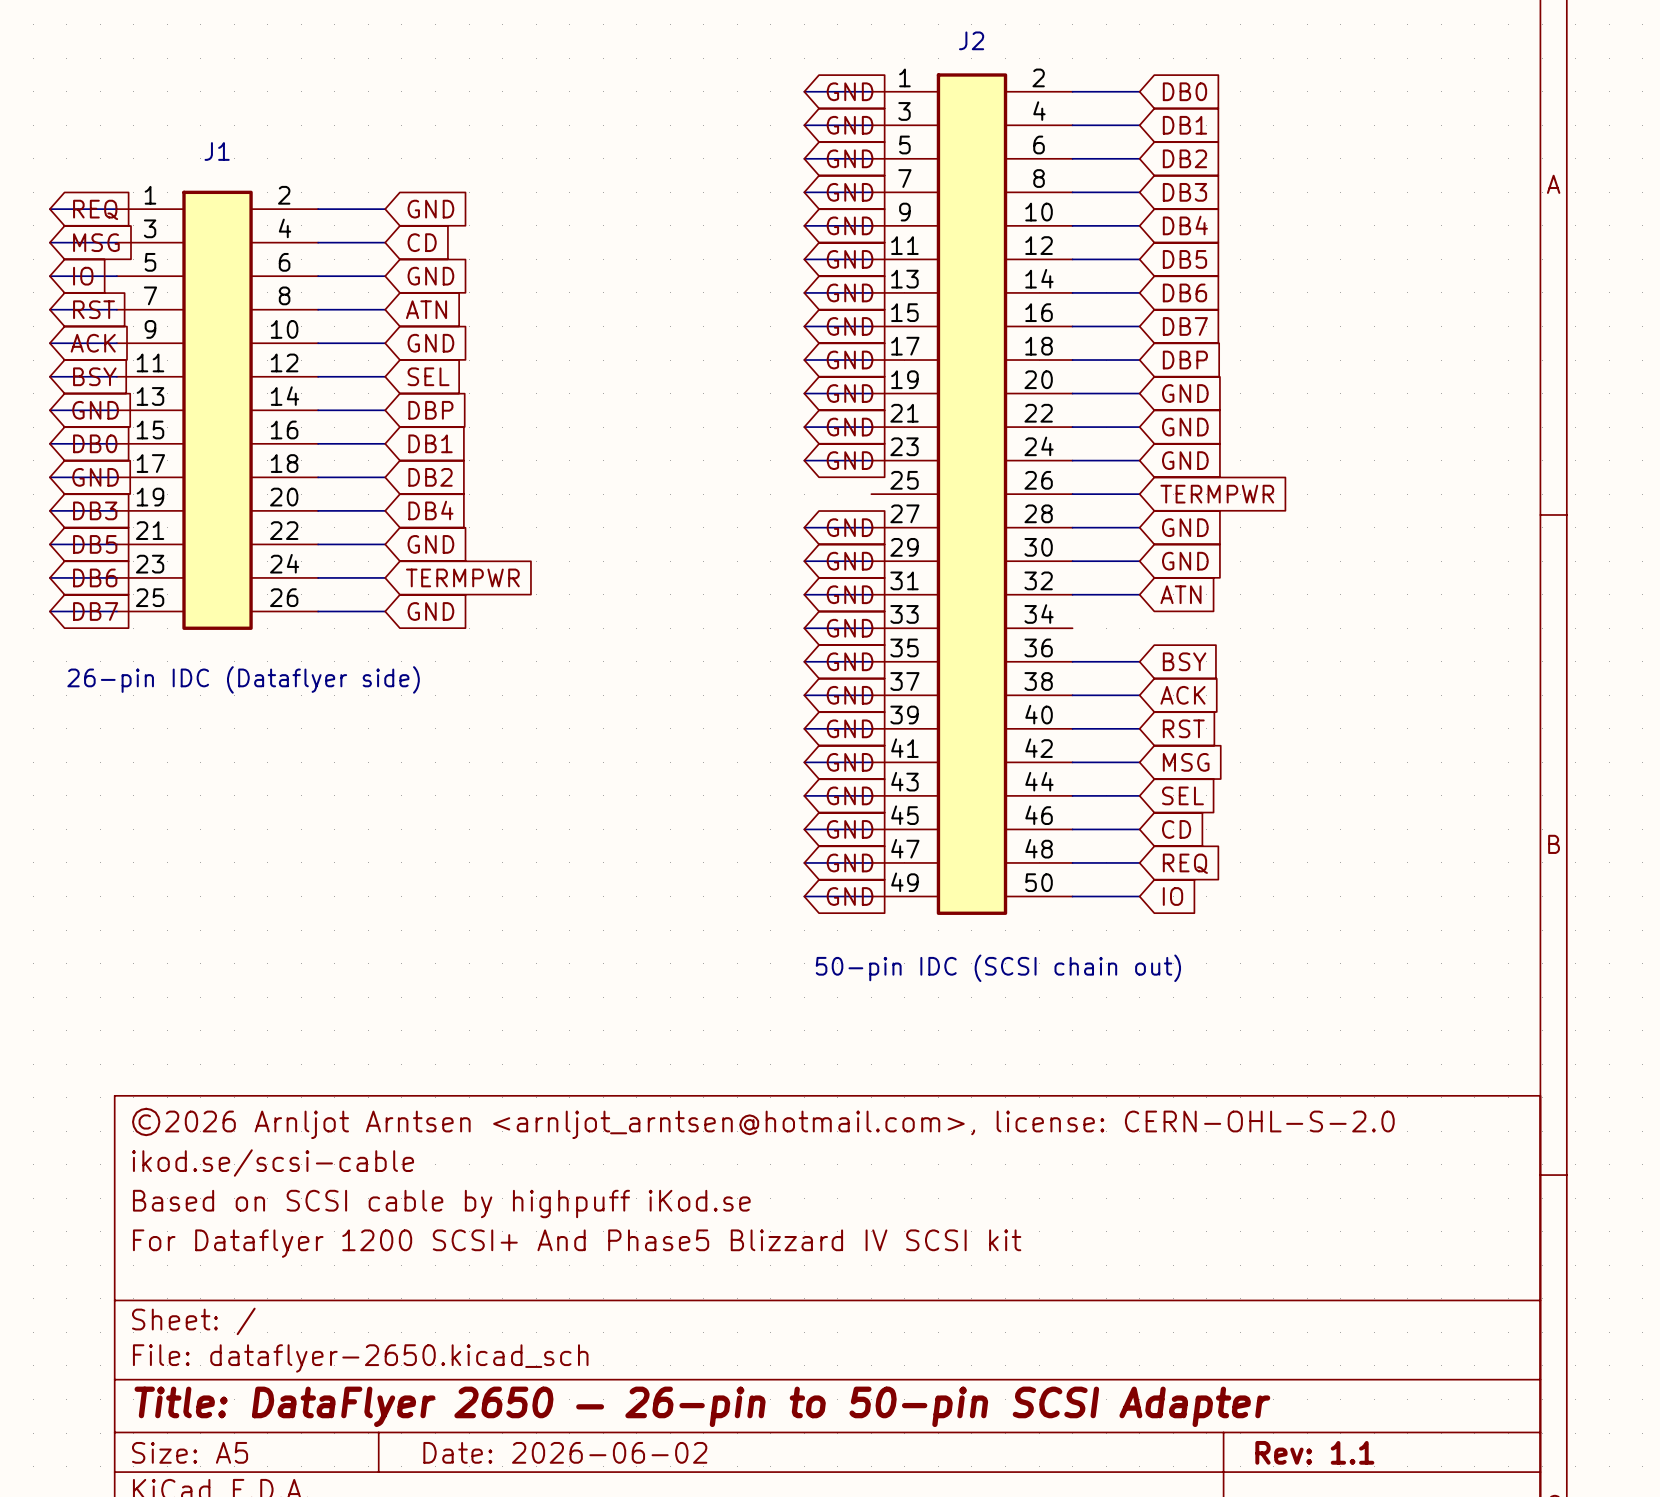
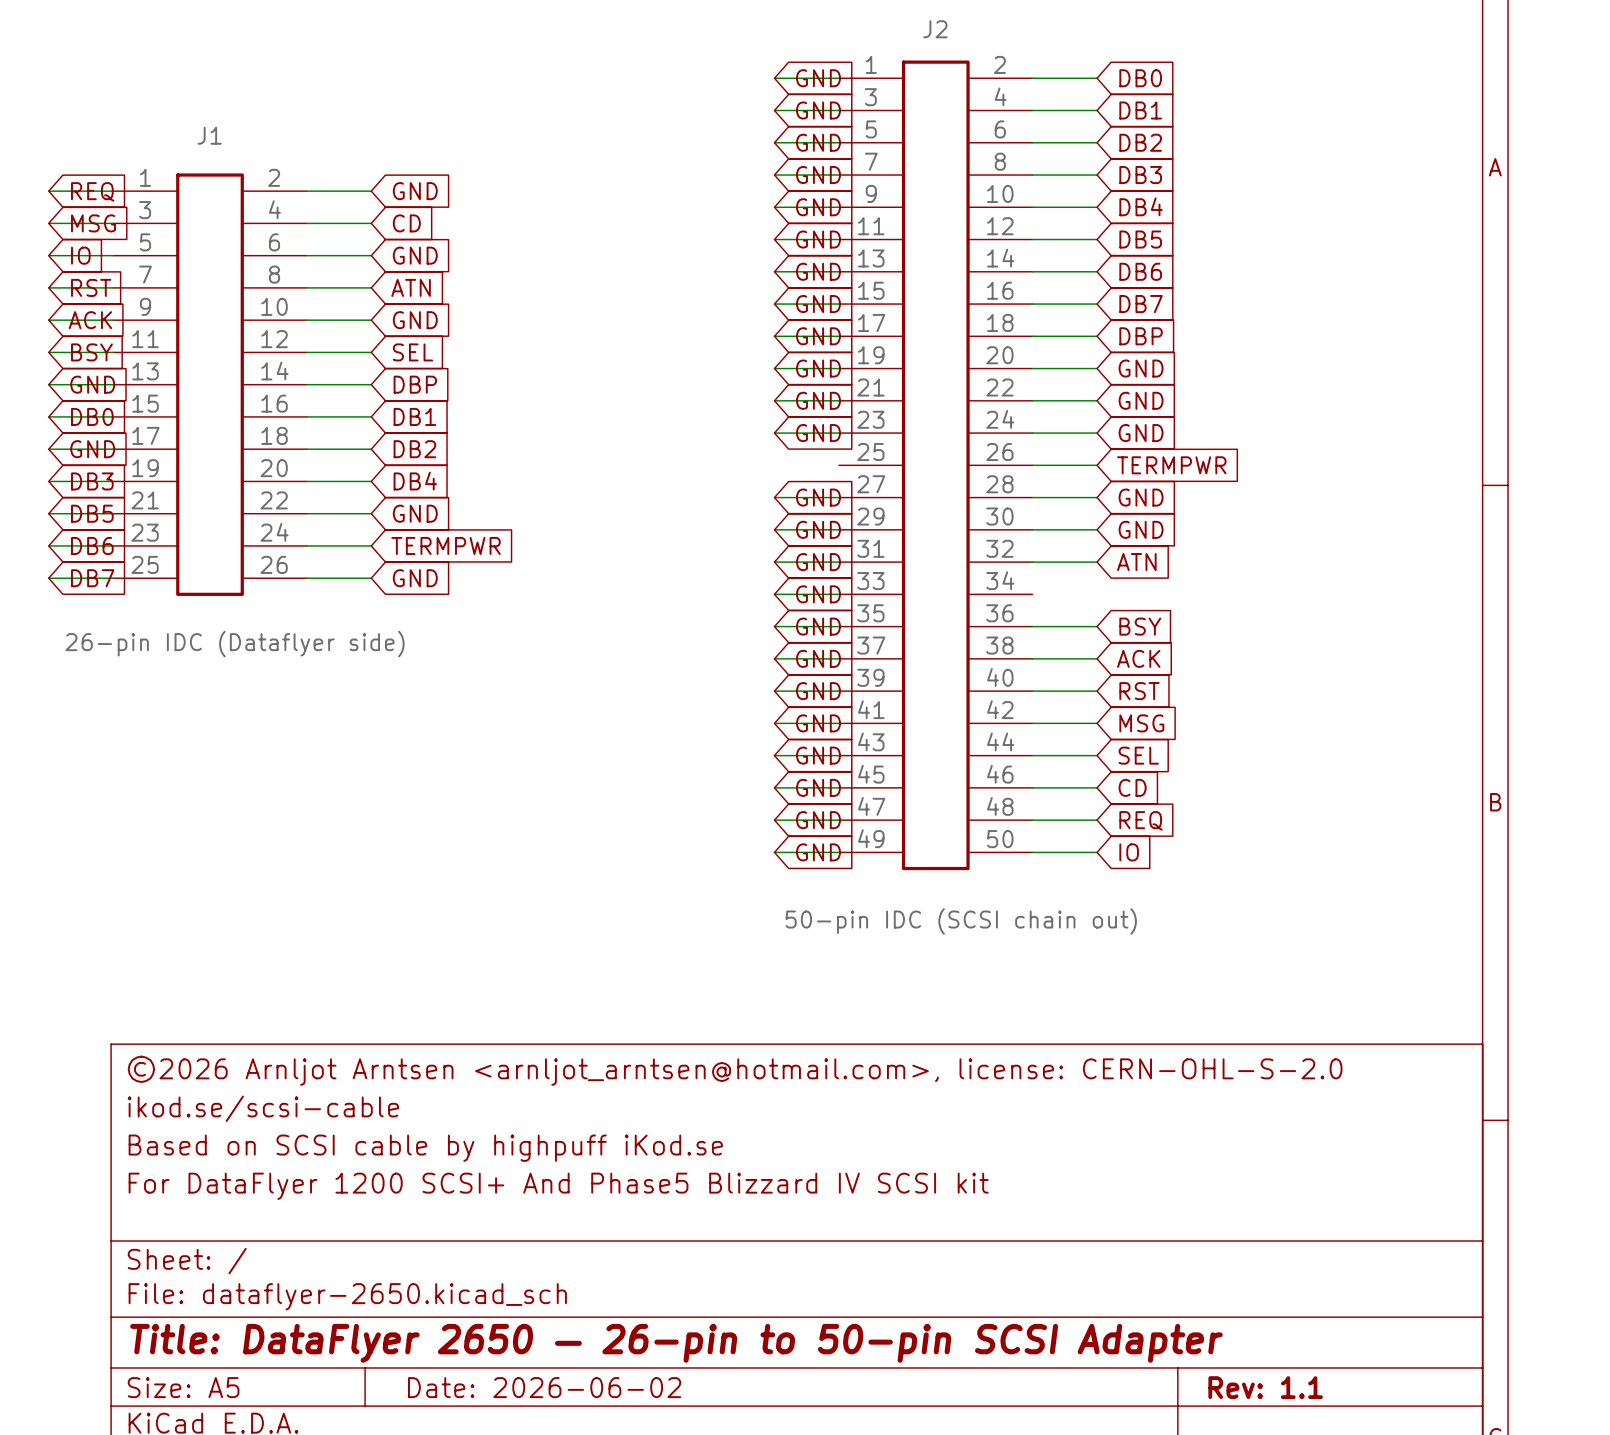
title block: For Dataflyer 1200 SCSI+ And Phase5 Blizzard IV SCSI kit (577, 1243) -> For DataFlyer 1200 SCSI+ And Phase5 Blizzard IV SCSI kit (558, 1186)

